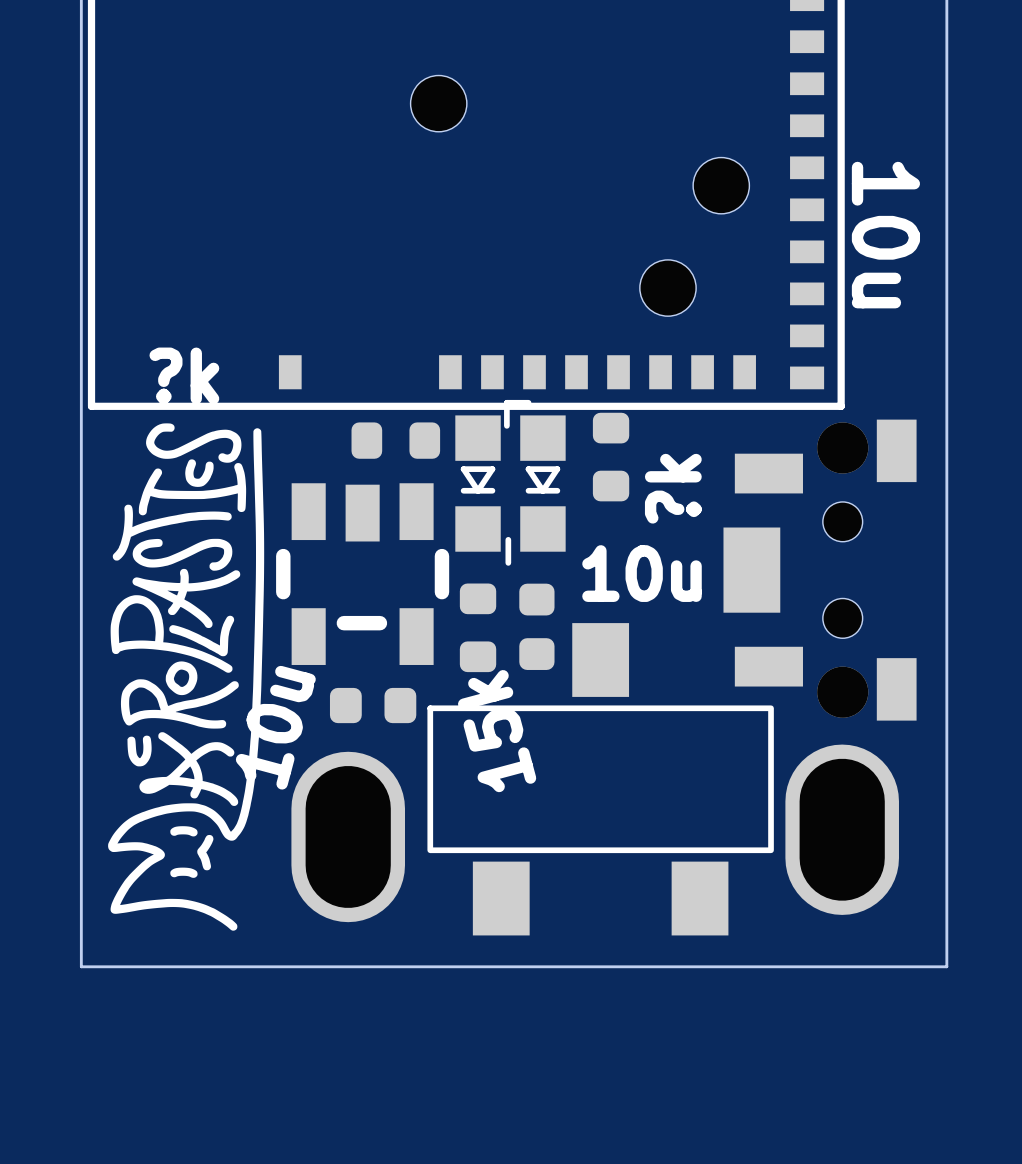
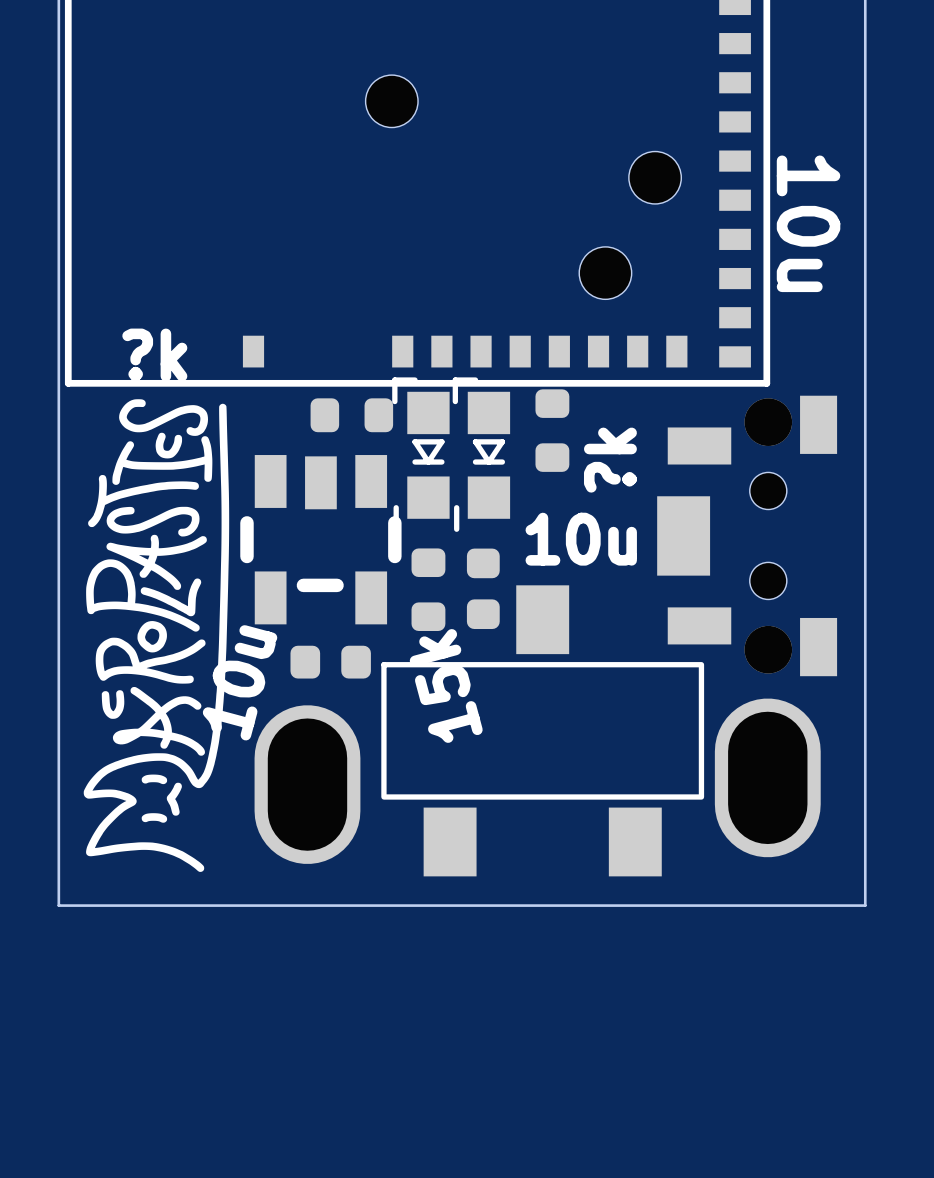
part footprint: [455, 415, 501, 552] -> [392, 377, 450, 532]

